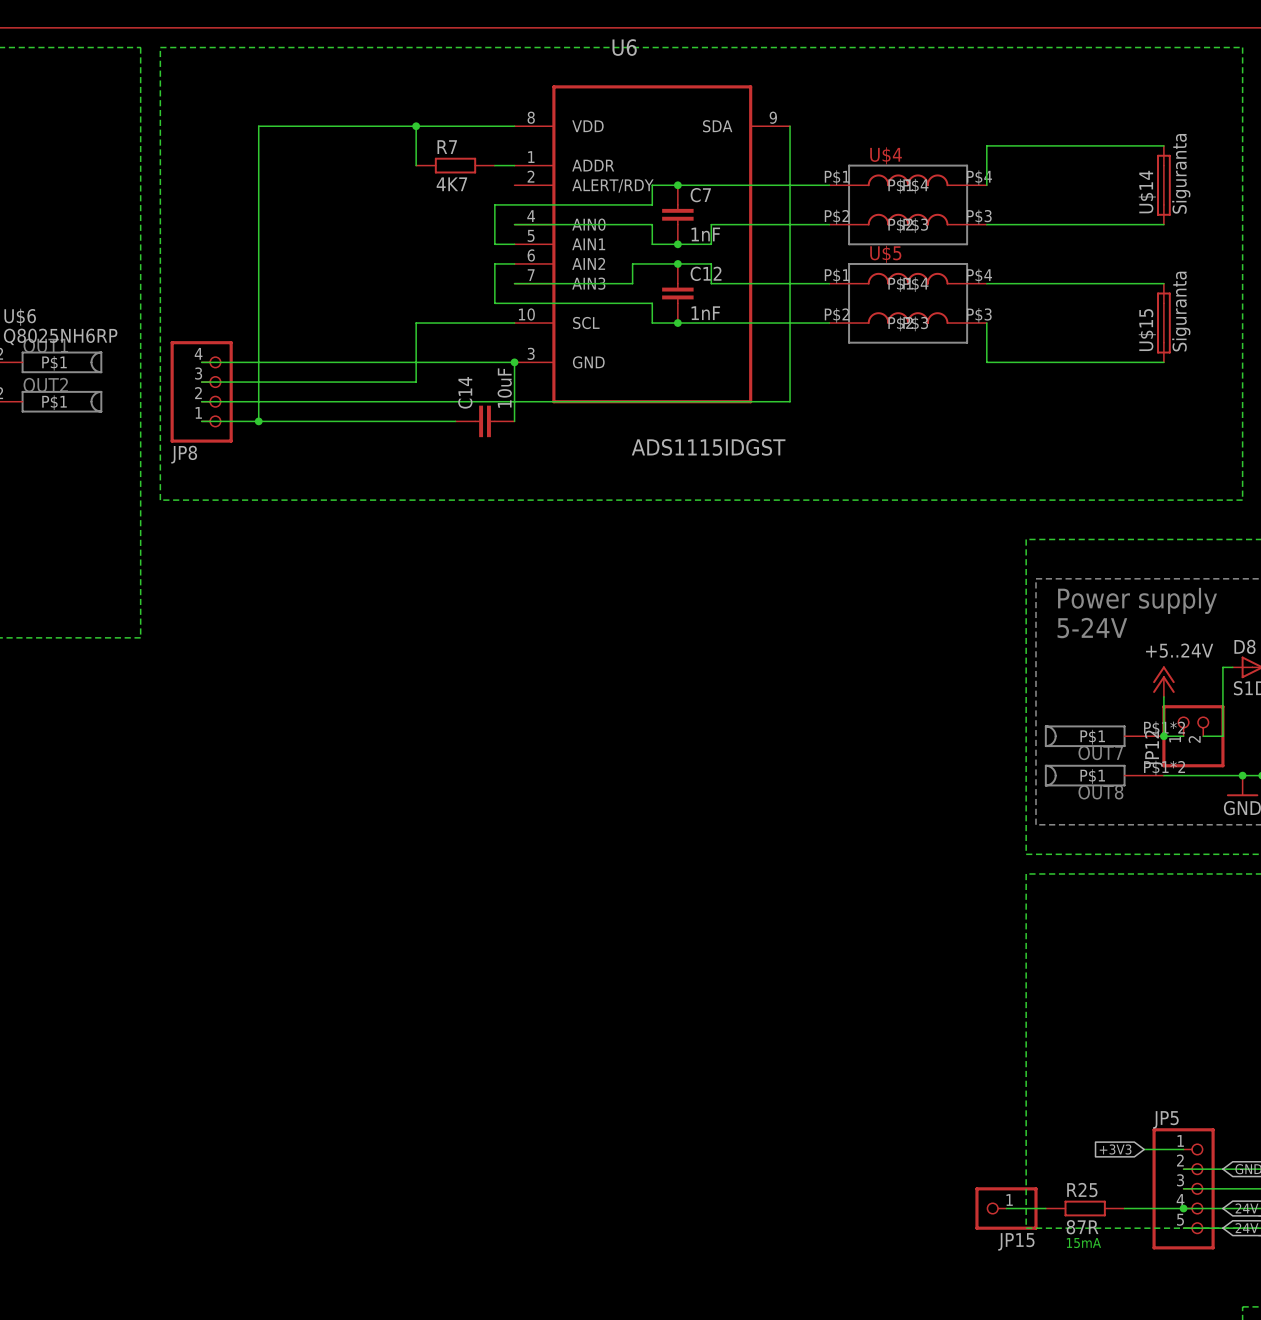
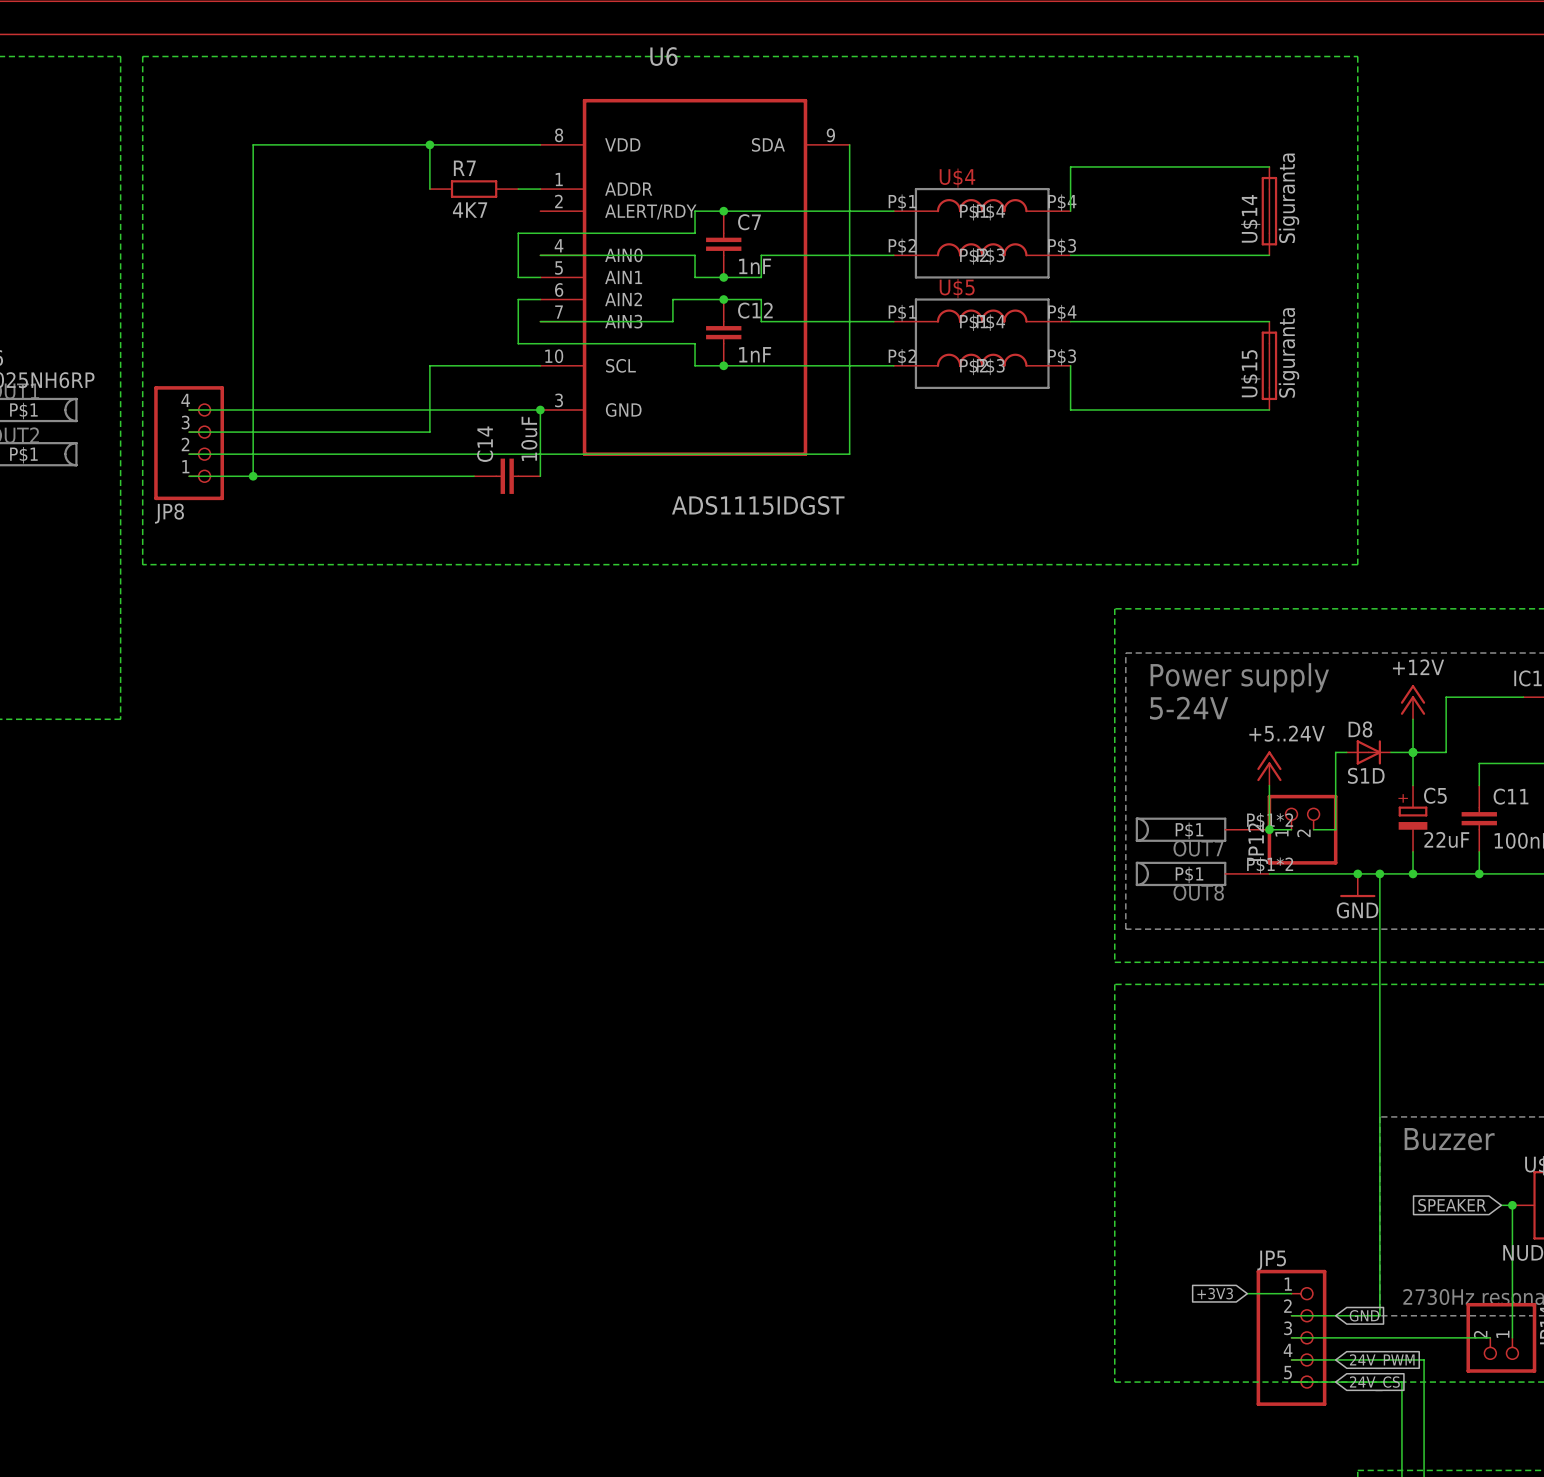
wire: (1006, 1208) (1045, 1208) -> none
JP15: (1006, 1208) -> none
R25: 87R (1085, 1208) -> none
wire: (1124, 1208) (1183, 1208) -> none
junction: (1183, 1208) -> none
text: 15mA (1083, 1243) -> none

